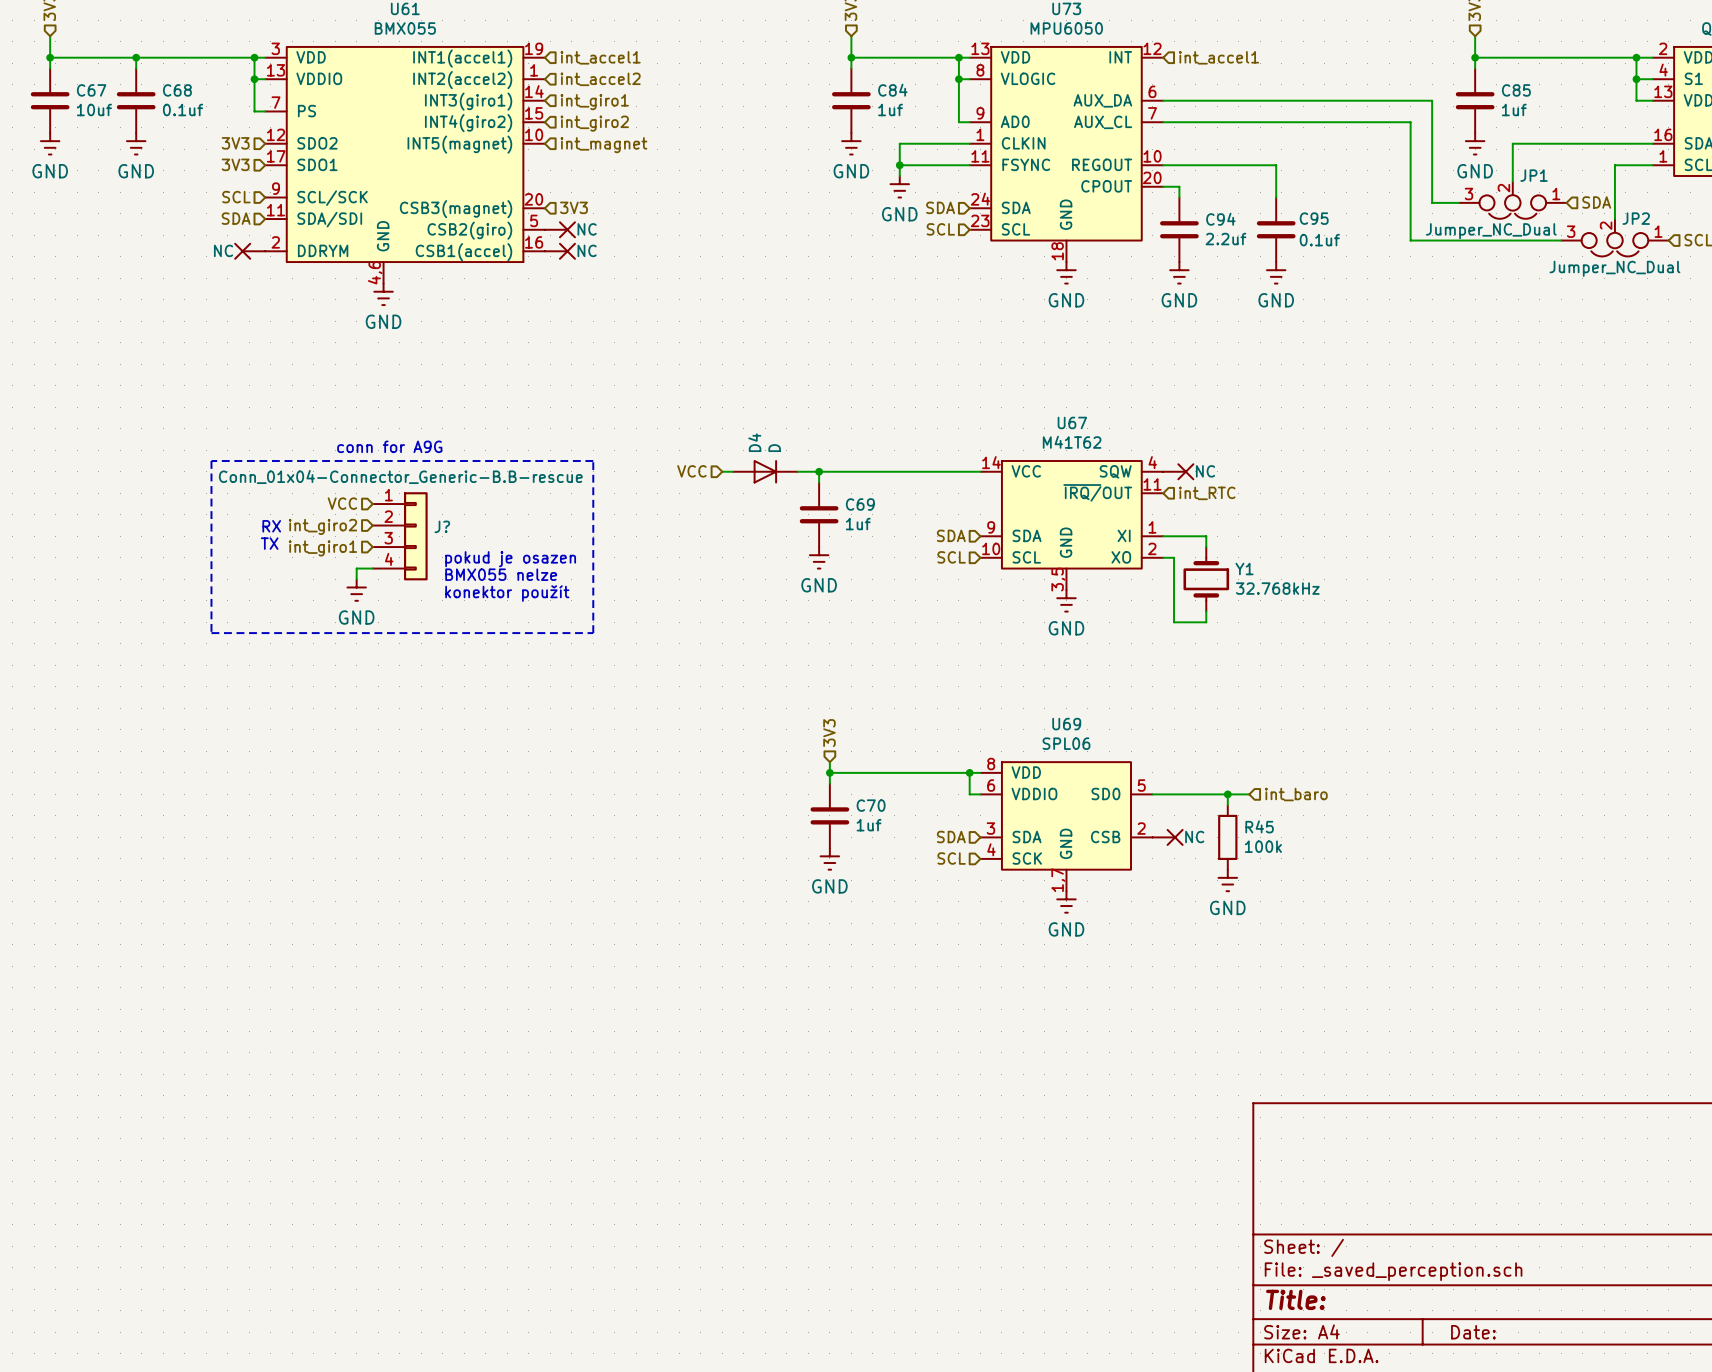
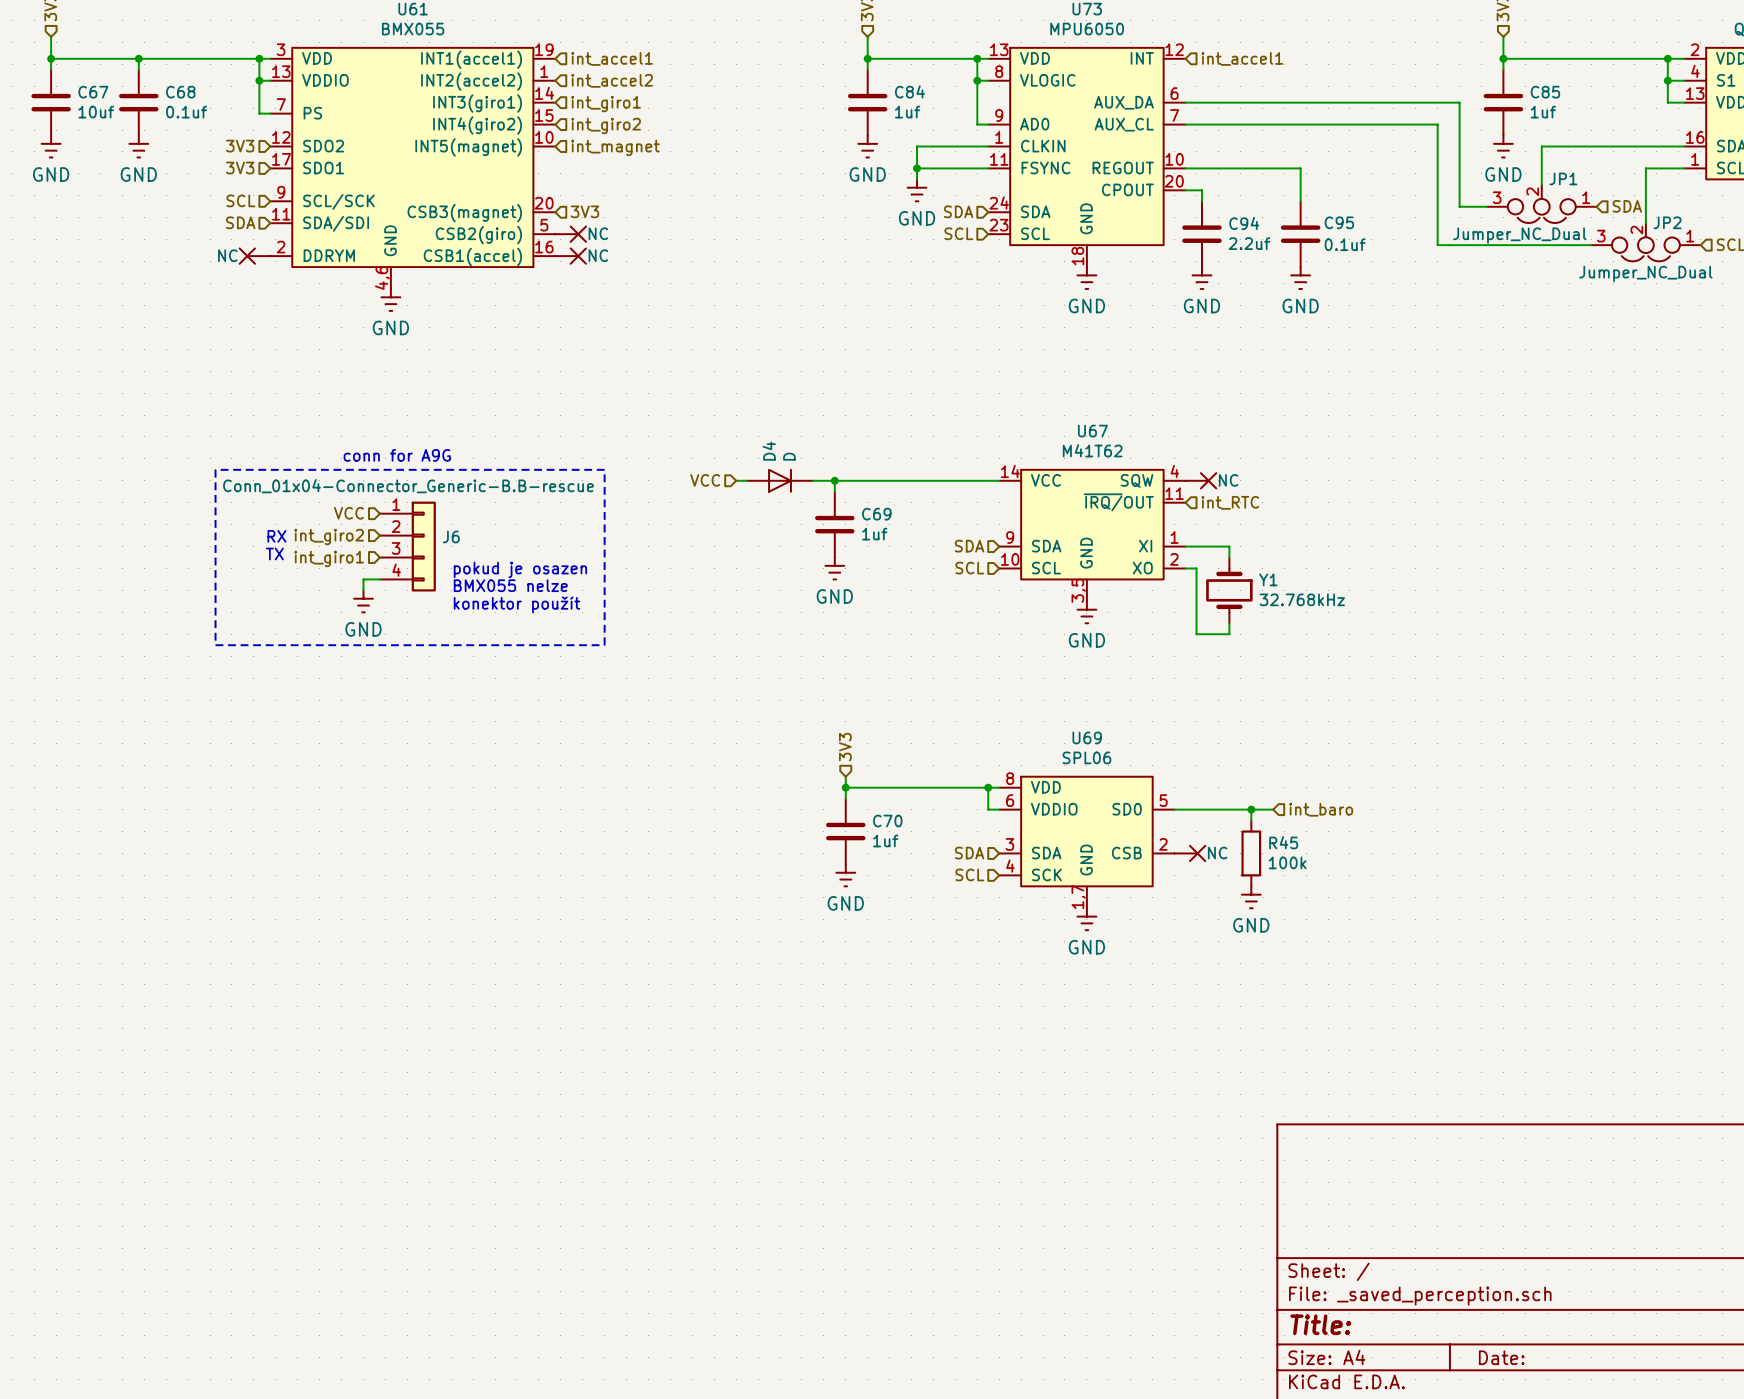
J? name: J? (442, 526) -> J6 (451, 536)

